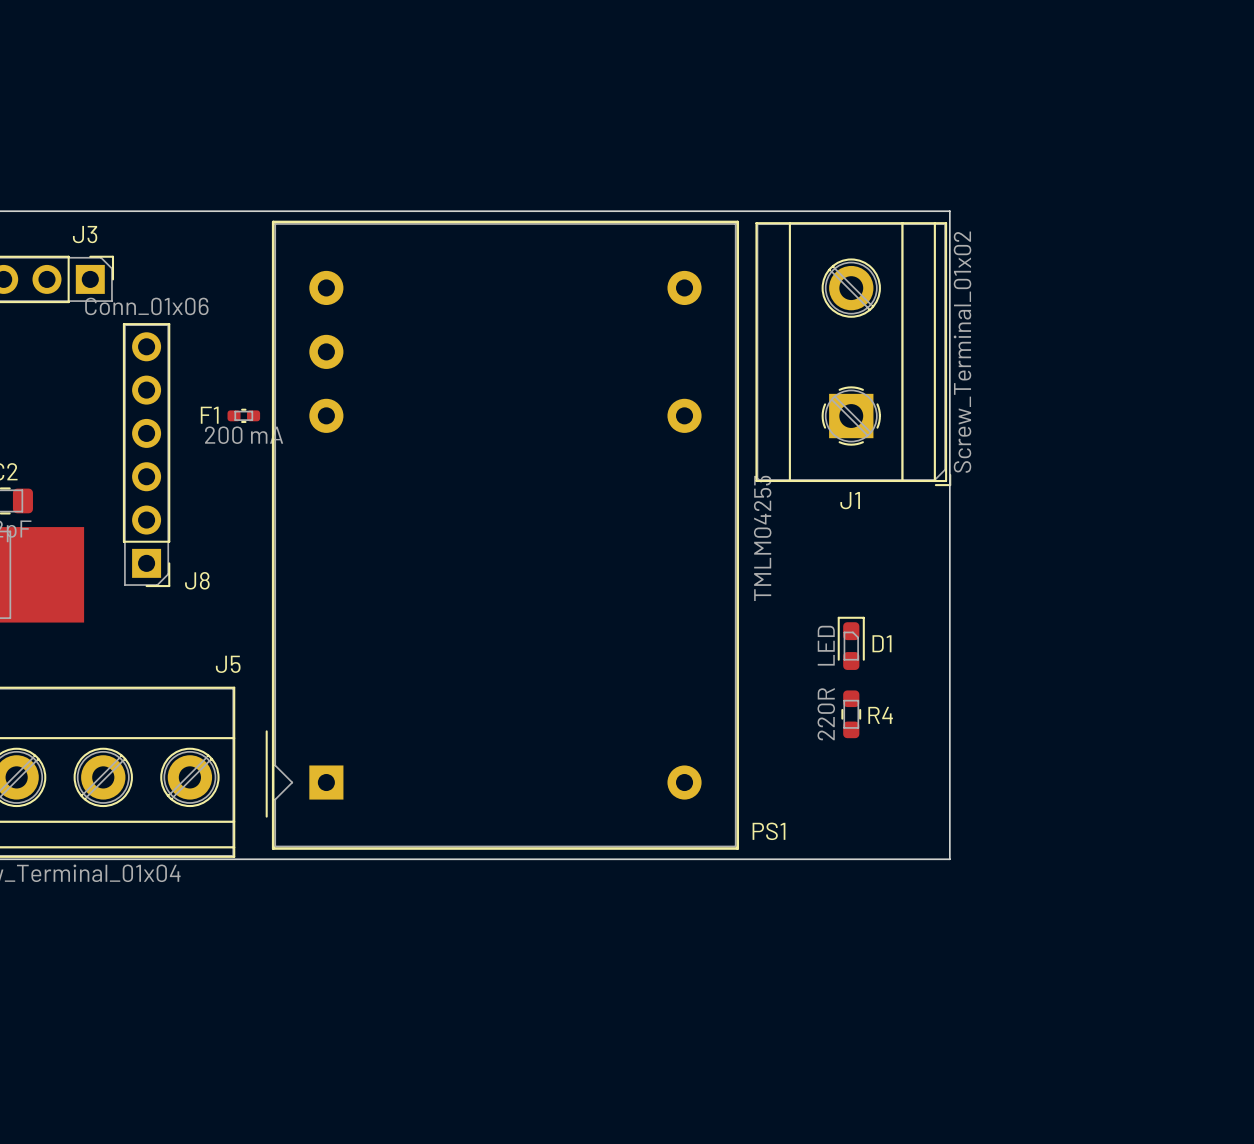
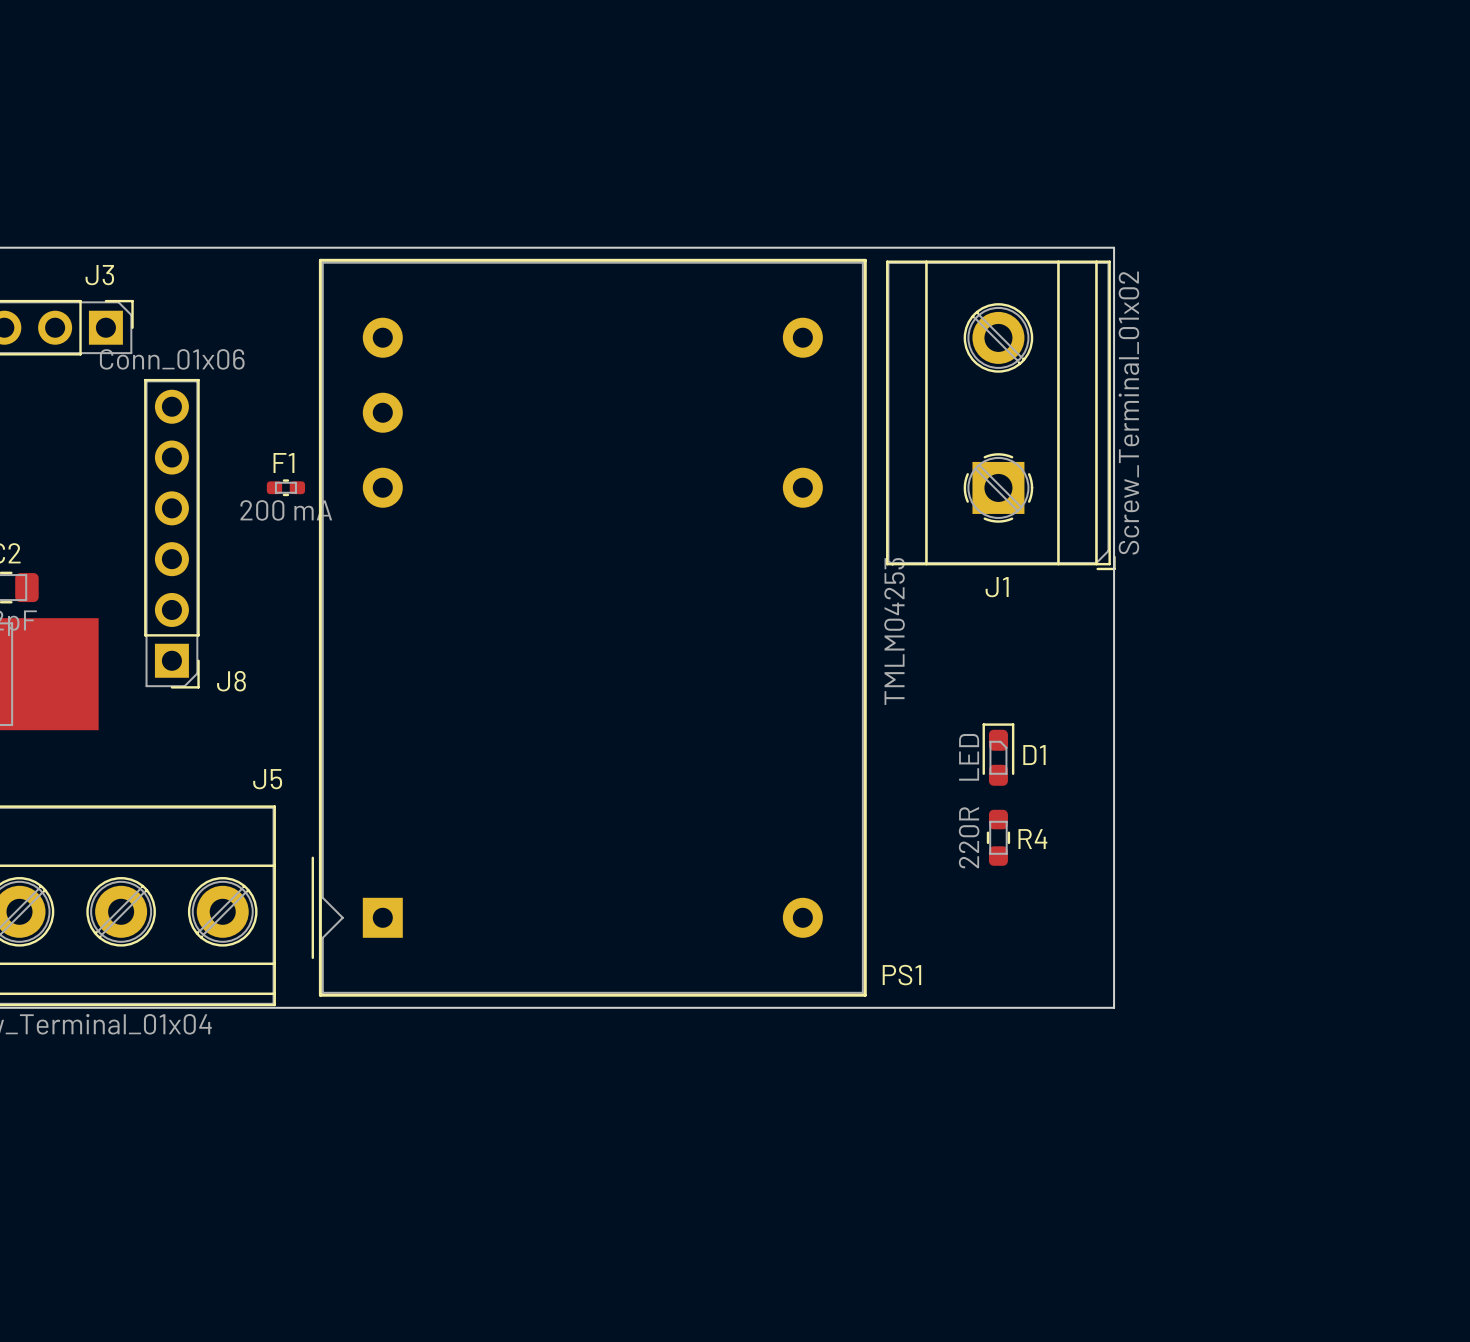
F1 name position: F1 (209, 415) -> F1 (283, 463)

